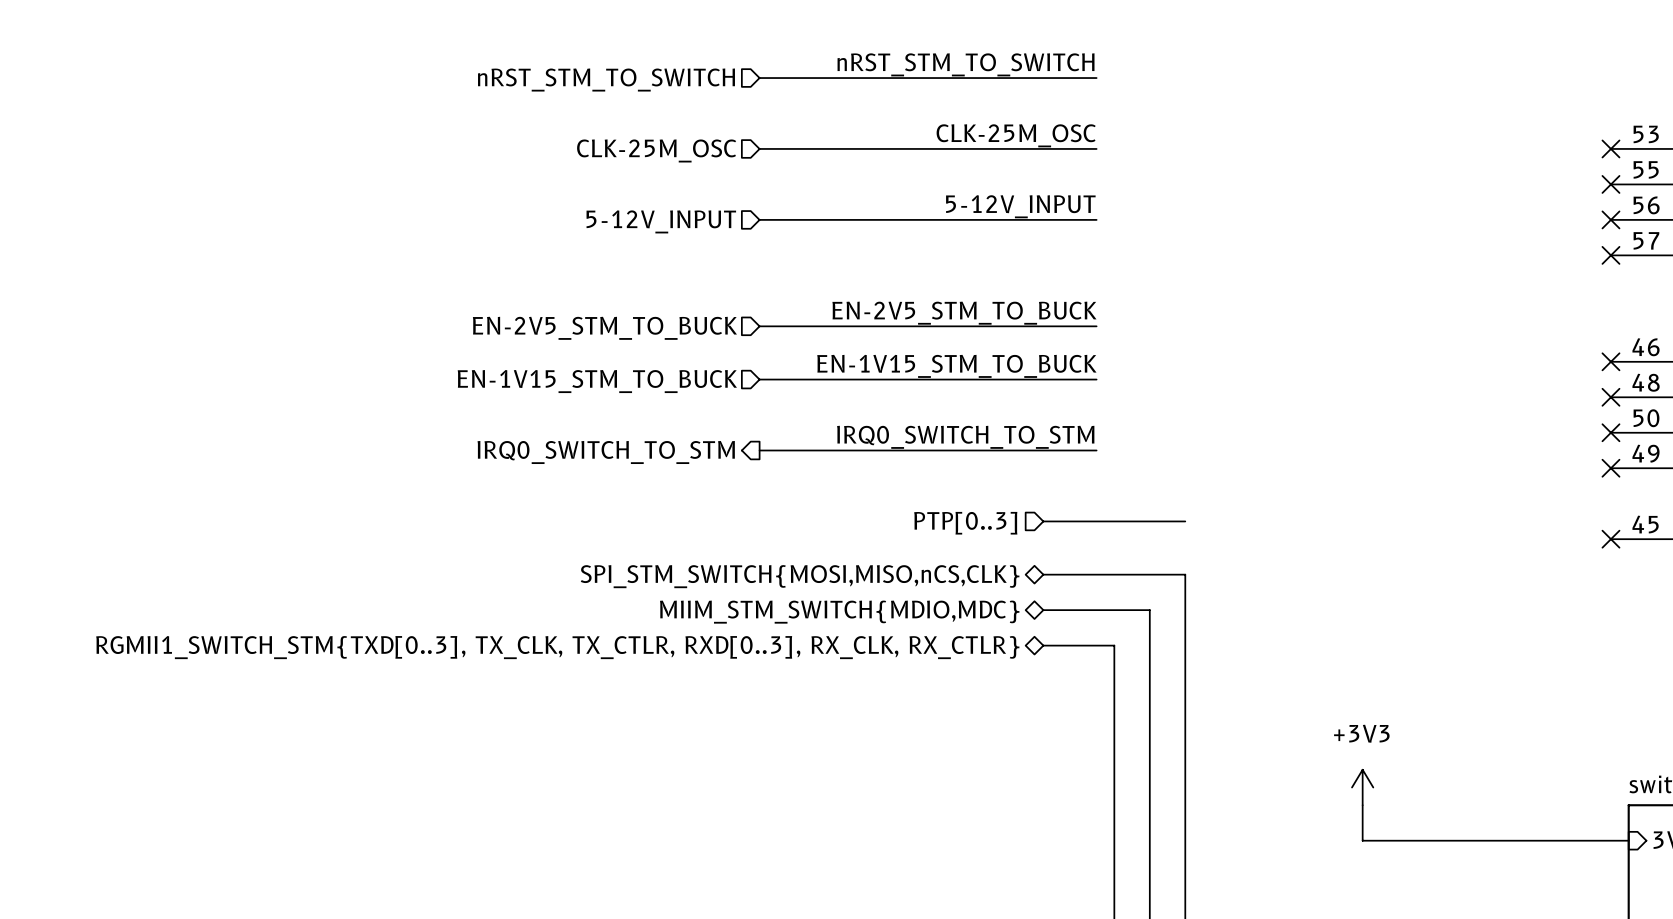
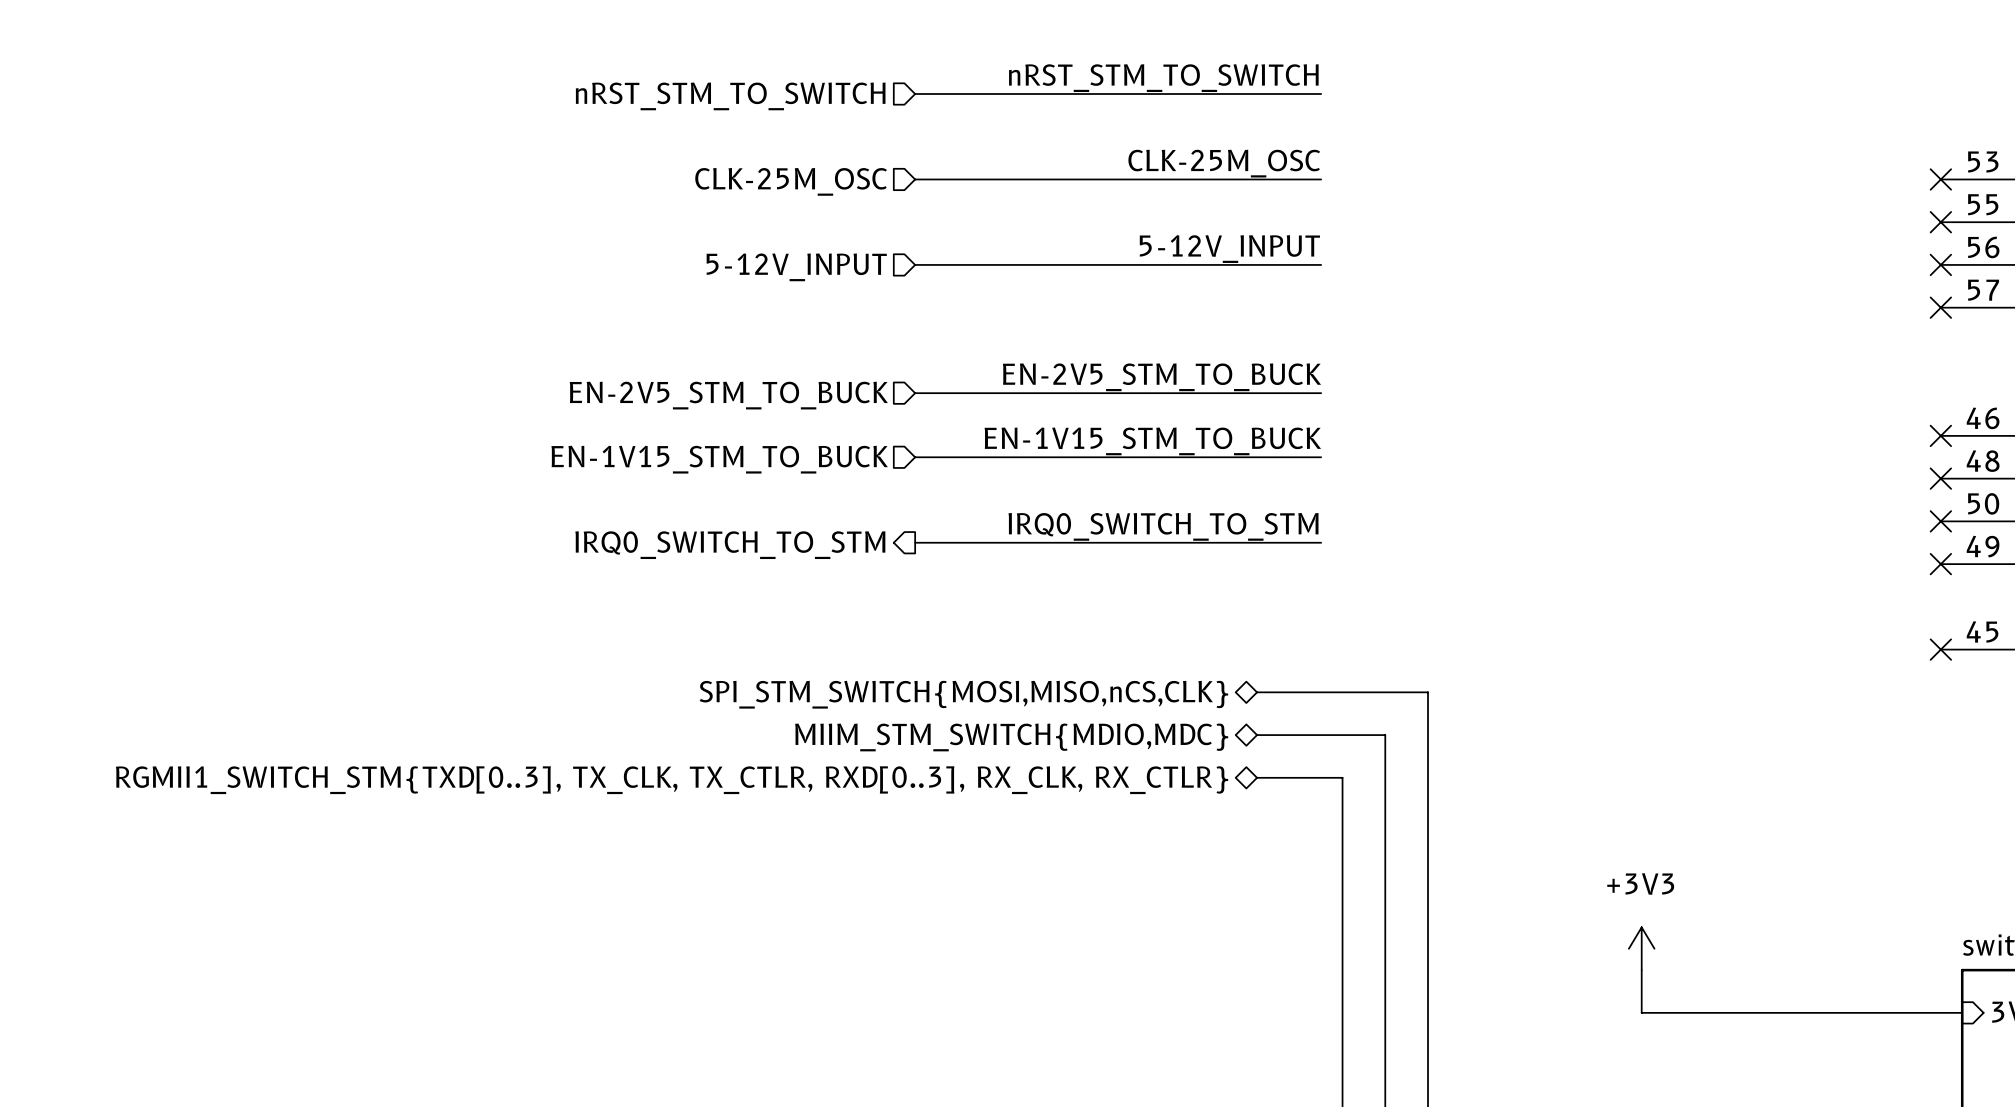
bus: (1043, 521) (1185, 521) -> none
hierarchical label: PTP[0..3] (965, 523) -> none

